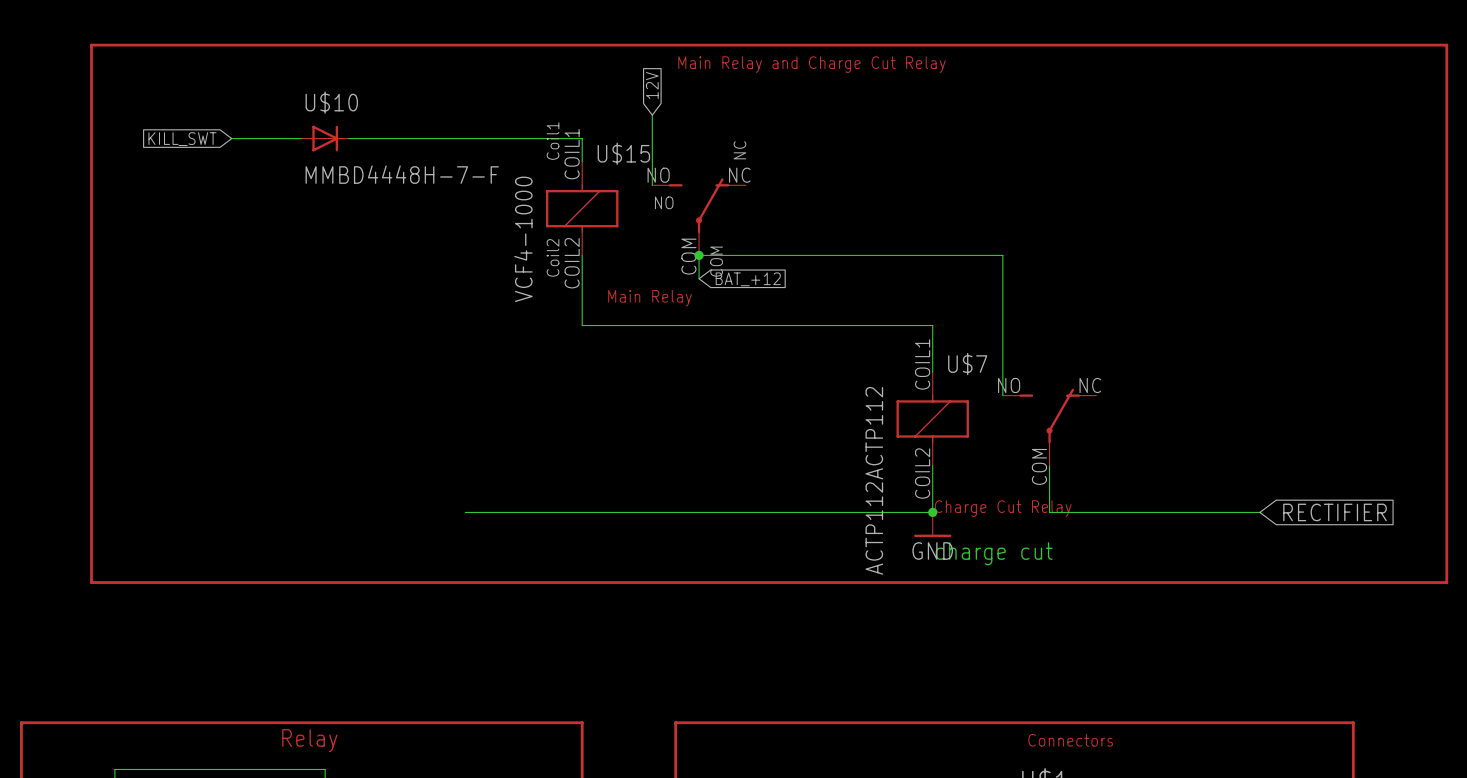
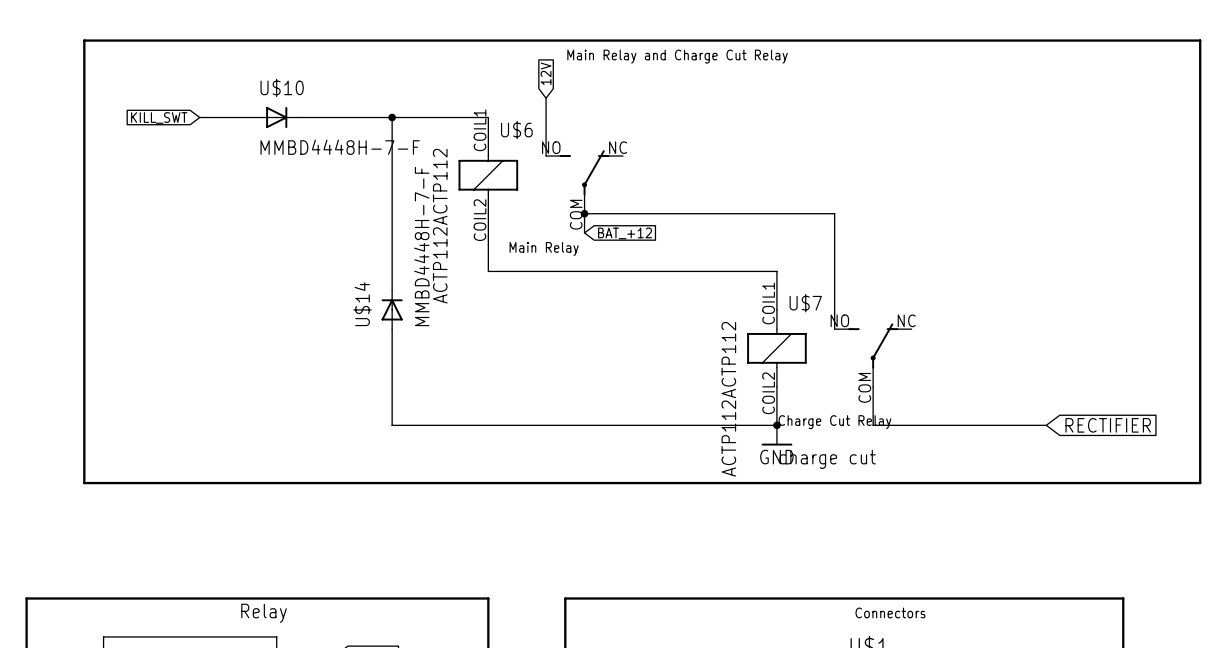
wire: none -> (392, 117) (392, 290)
junction: none -> (392, 117)
U$15 text: Coil1 (553, 141) -> none
U$15 text: NC (739, 150) -> none
U$15 name: U$15 (623, 153) -> U$6 (516, 130)
U$15 text: NO (664, 202) -> none
U$15 value: VCF4-1000 (523, 239) -> ACTP112ACTP112 (440, 226)
U$15 text: Coil2 (553, 257) -> none
U$15 text: COM (716, 261) -> none
U$14: none -> MMBD4448H-7-F (392, 309)
wire: none -> (392, 329) (392, 425)

